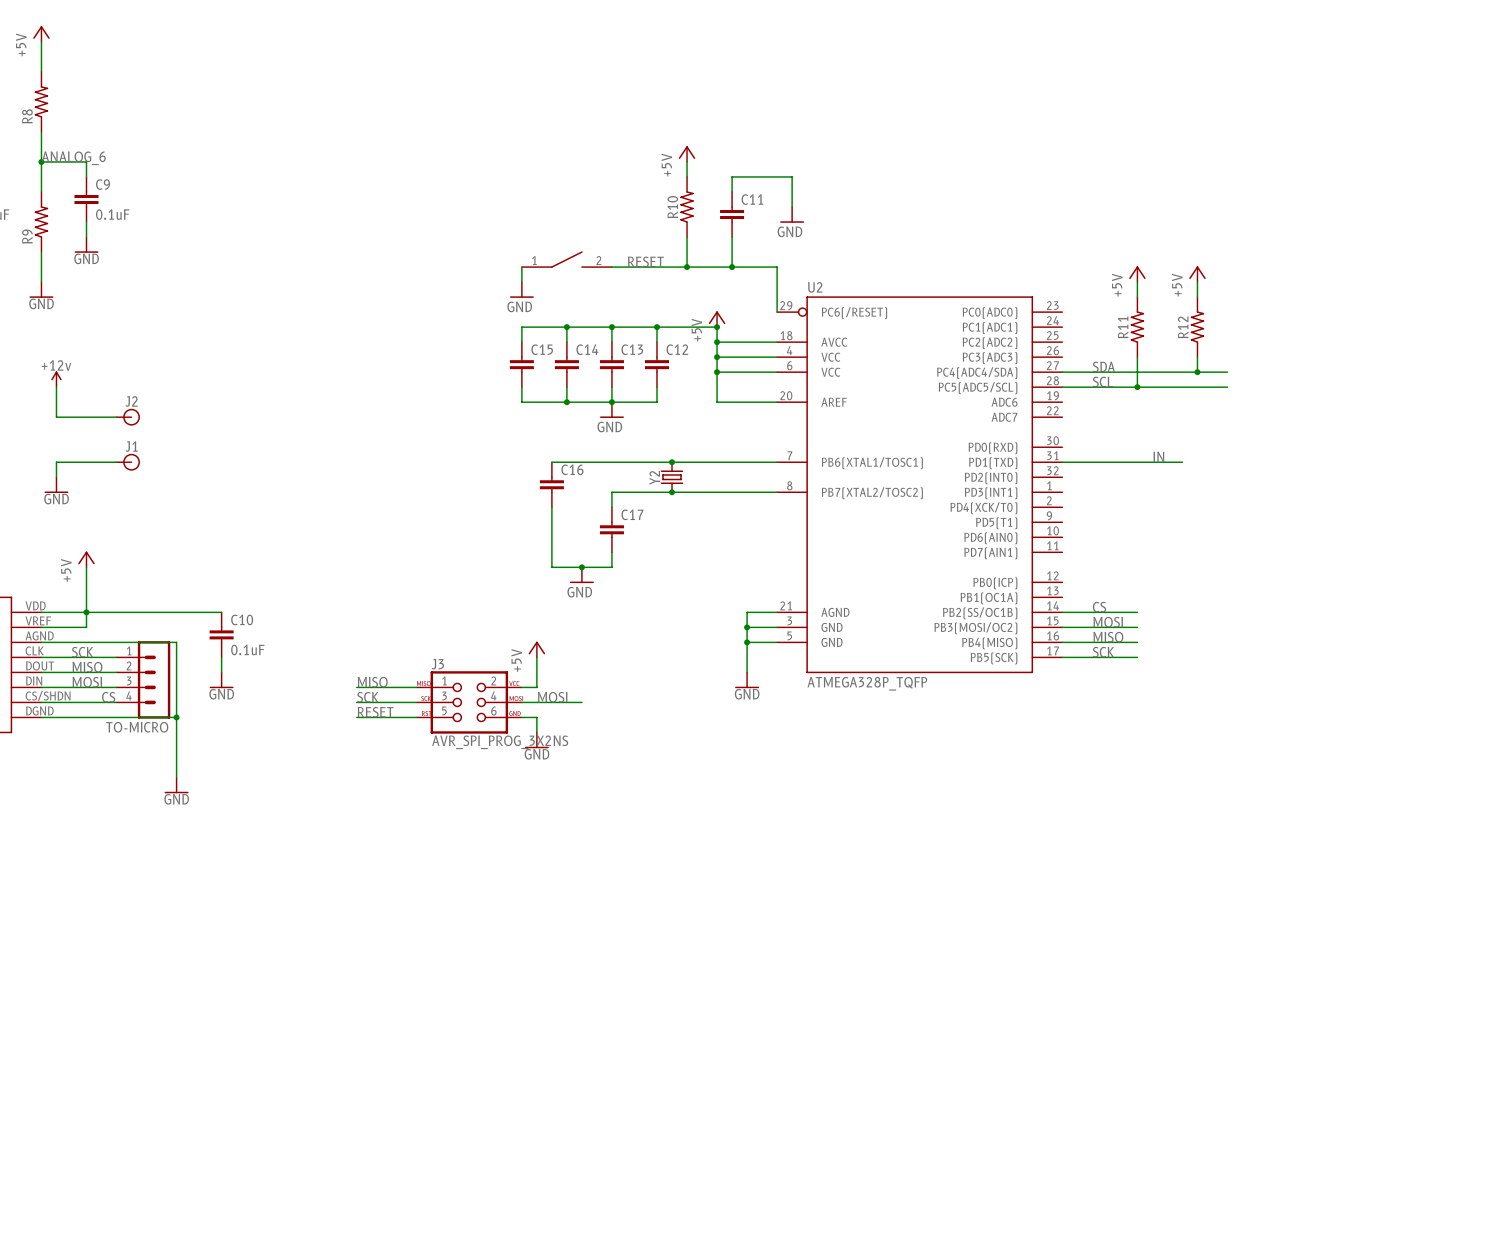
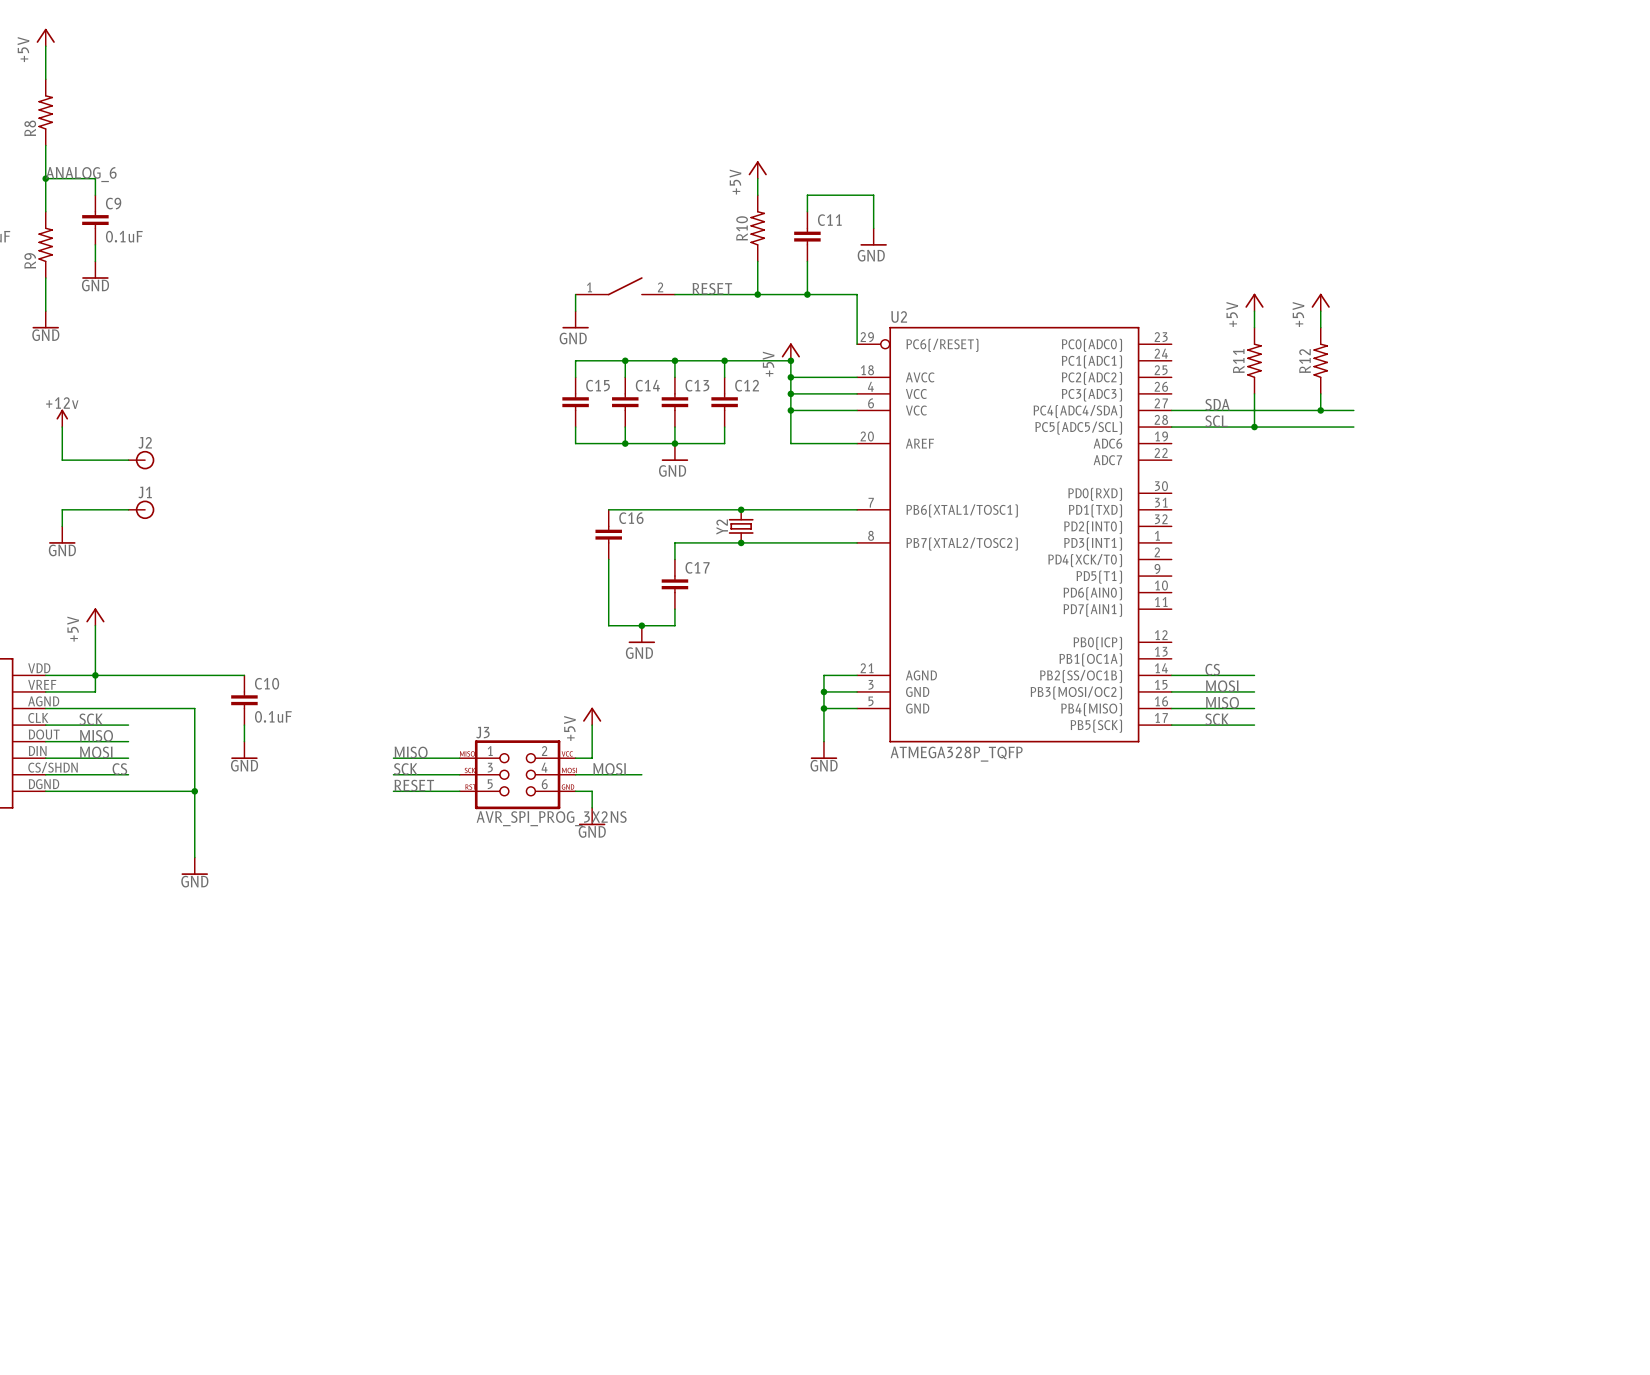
label: IN (1158, 456) -> none
wire: (1062, 462) (1182, 462) -> none
TO-MICRO: (143, 679) -> none

